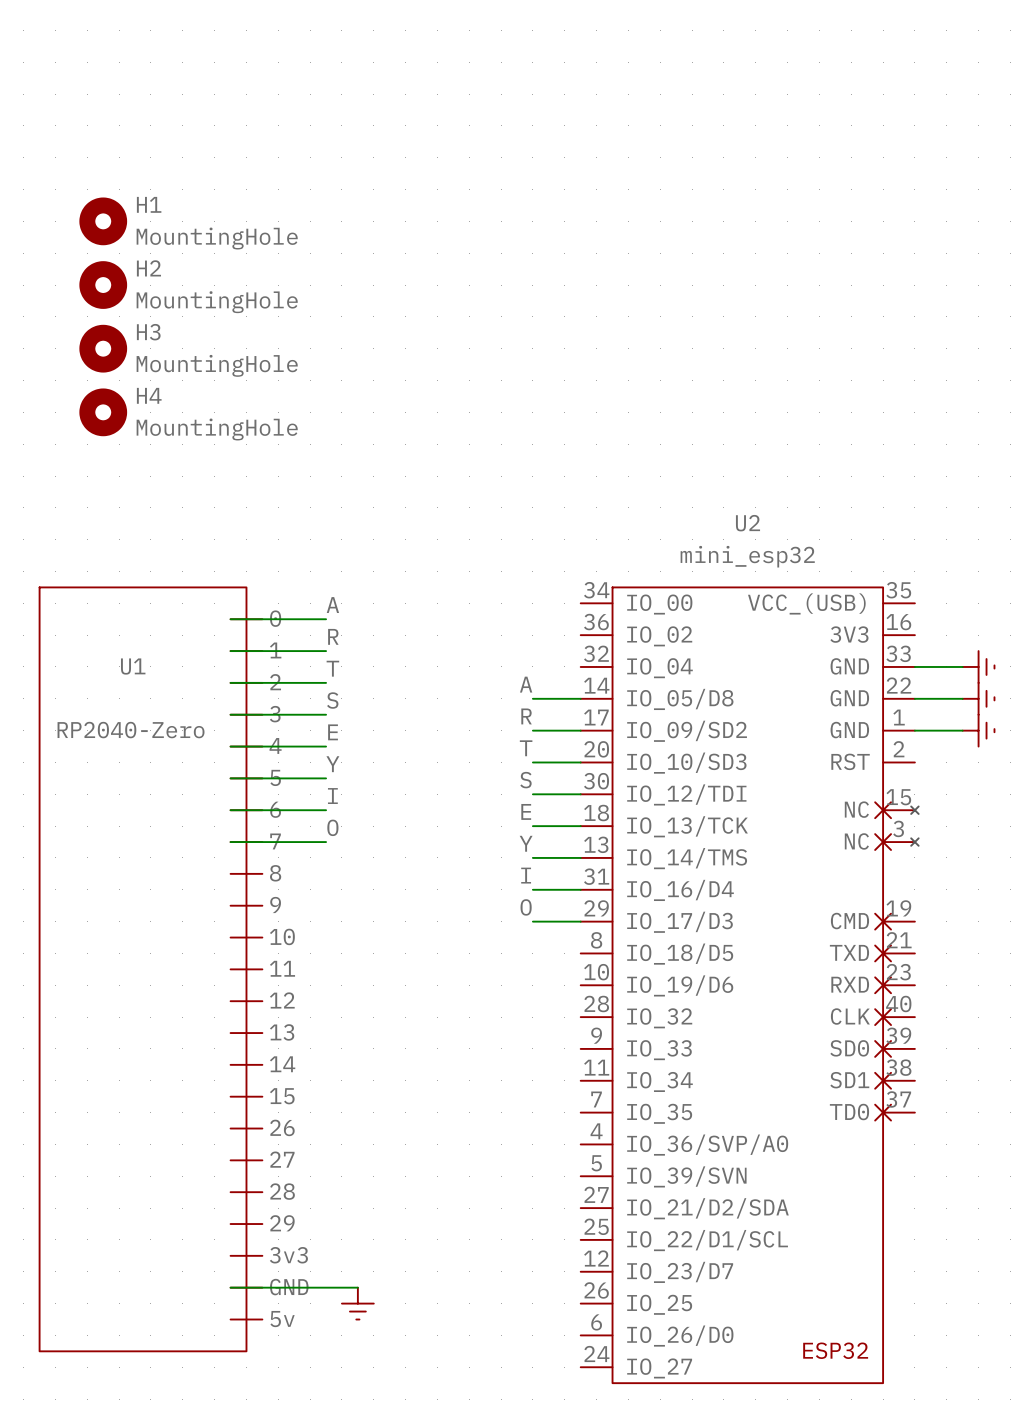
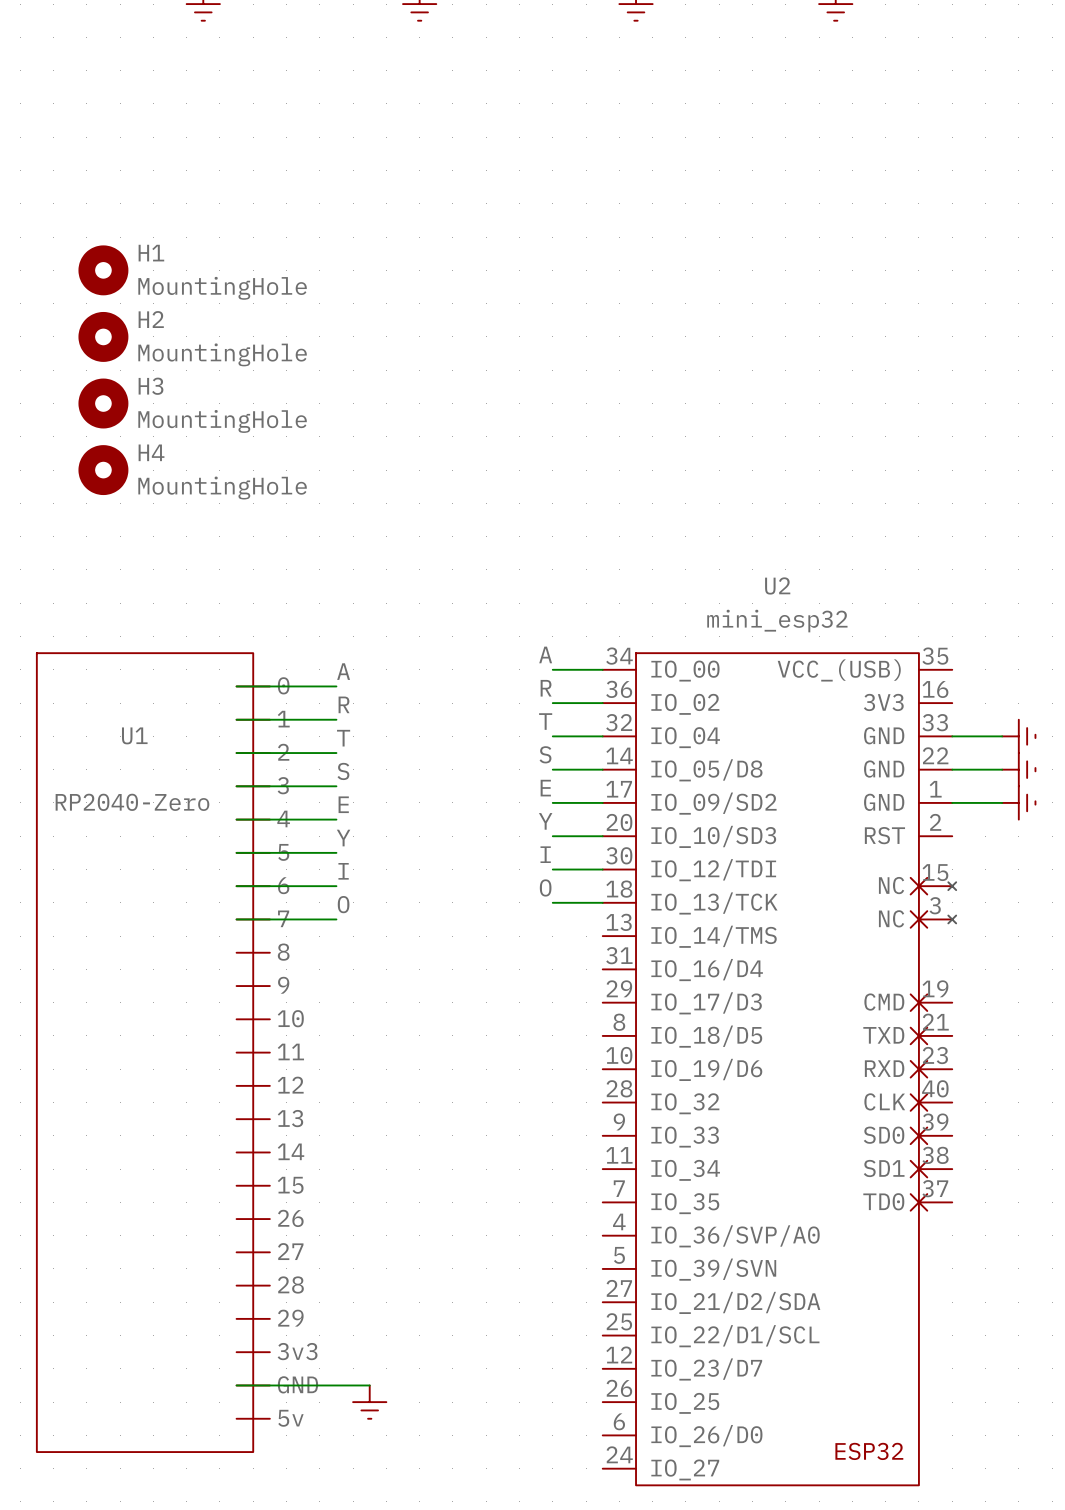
label: none -> A (545, 654)
label: none -> R (546, 688)
label: none -> T (545, 721)
label: A (526, 684) -> S (545, 754)
label: R (526, 716) -> E (545, 788)
label: T (526, 748) -> Y (545, 821)
label: S (525, 780) -> I (545, 854)
label: E (526, 811) -> O (545, 887)
label: Y (526, 843) -> none
wire: (532, 857) (580, 857) -> (552, 669) (602, 669)
label: I (526, 875) -> none
wire: (532, 889) (580, 889) -> (552, 703) (602, 703)
label: O (526, 907) -> none
wire: (532, 921) (580, 921) -> (552, 736) (602, 736)

